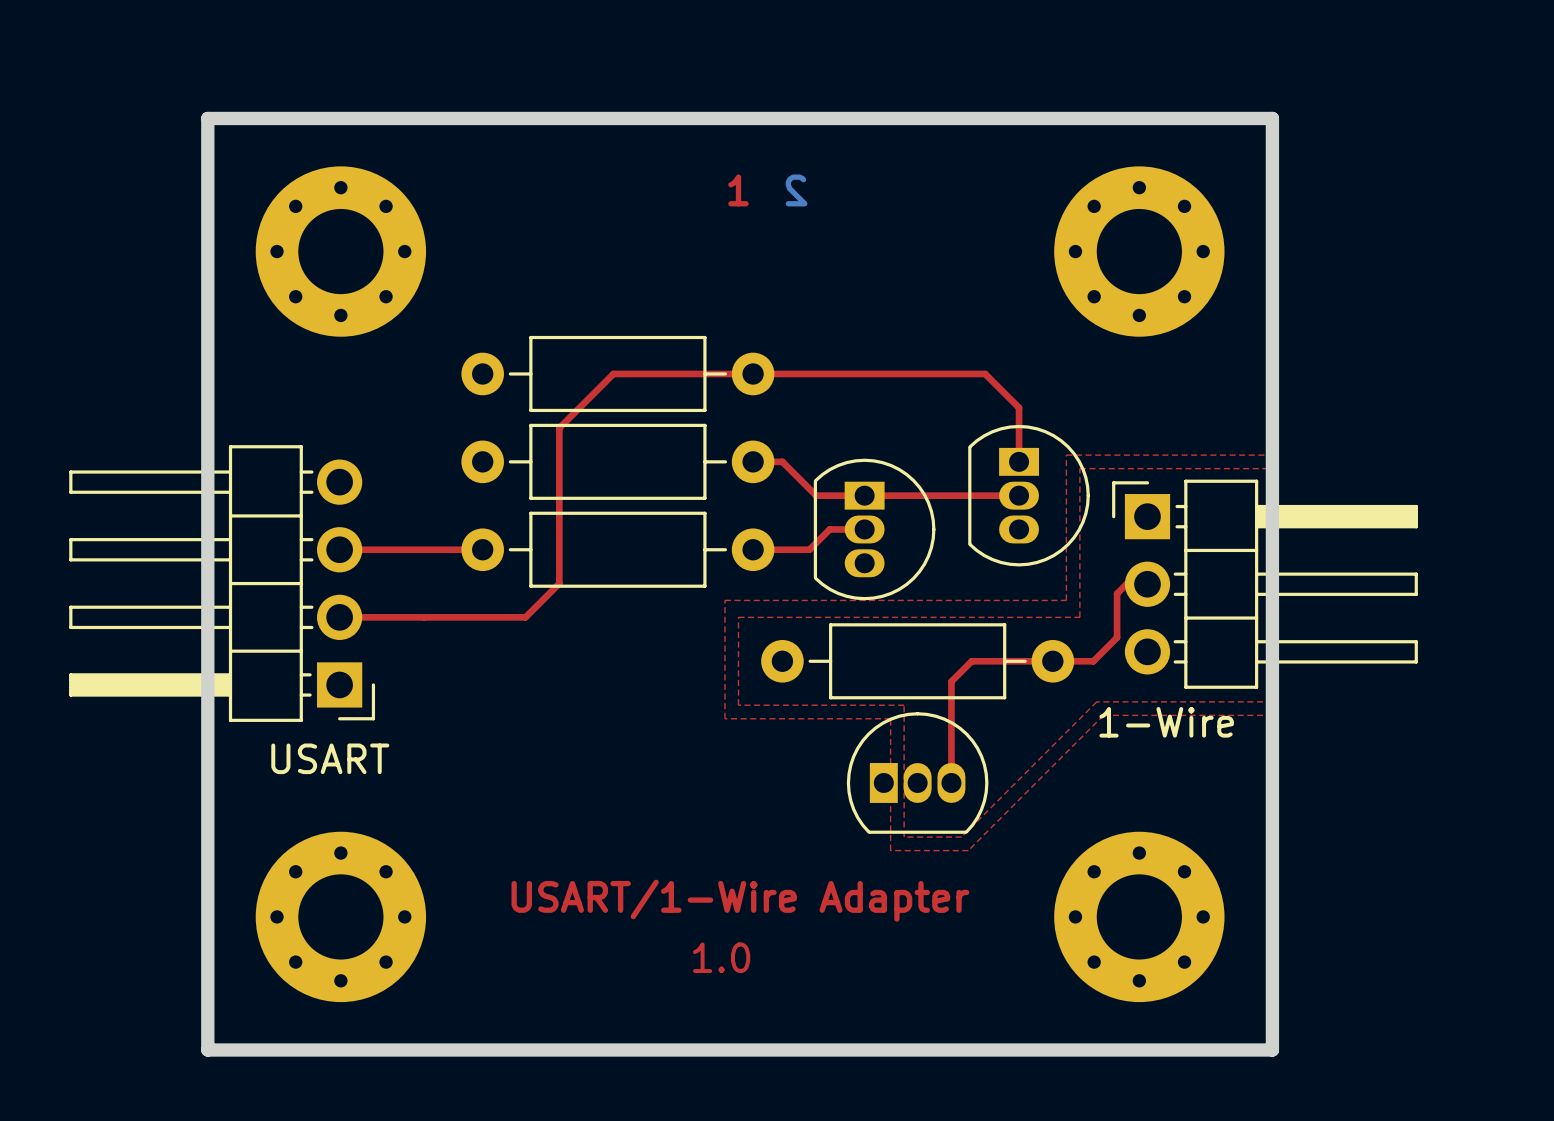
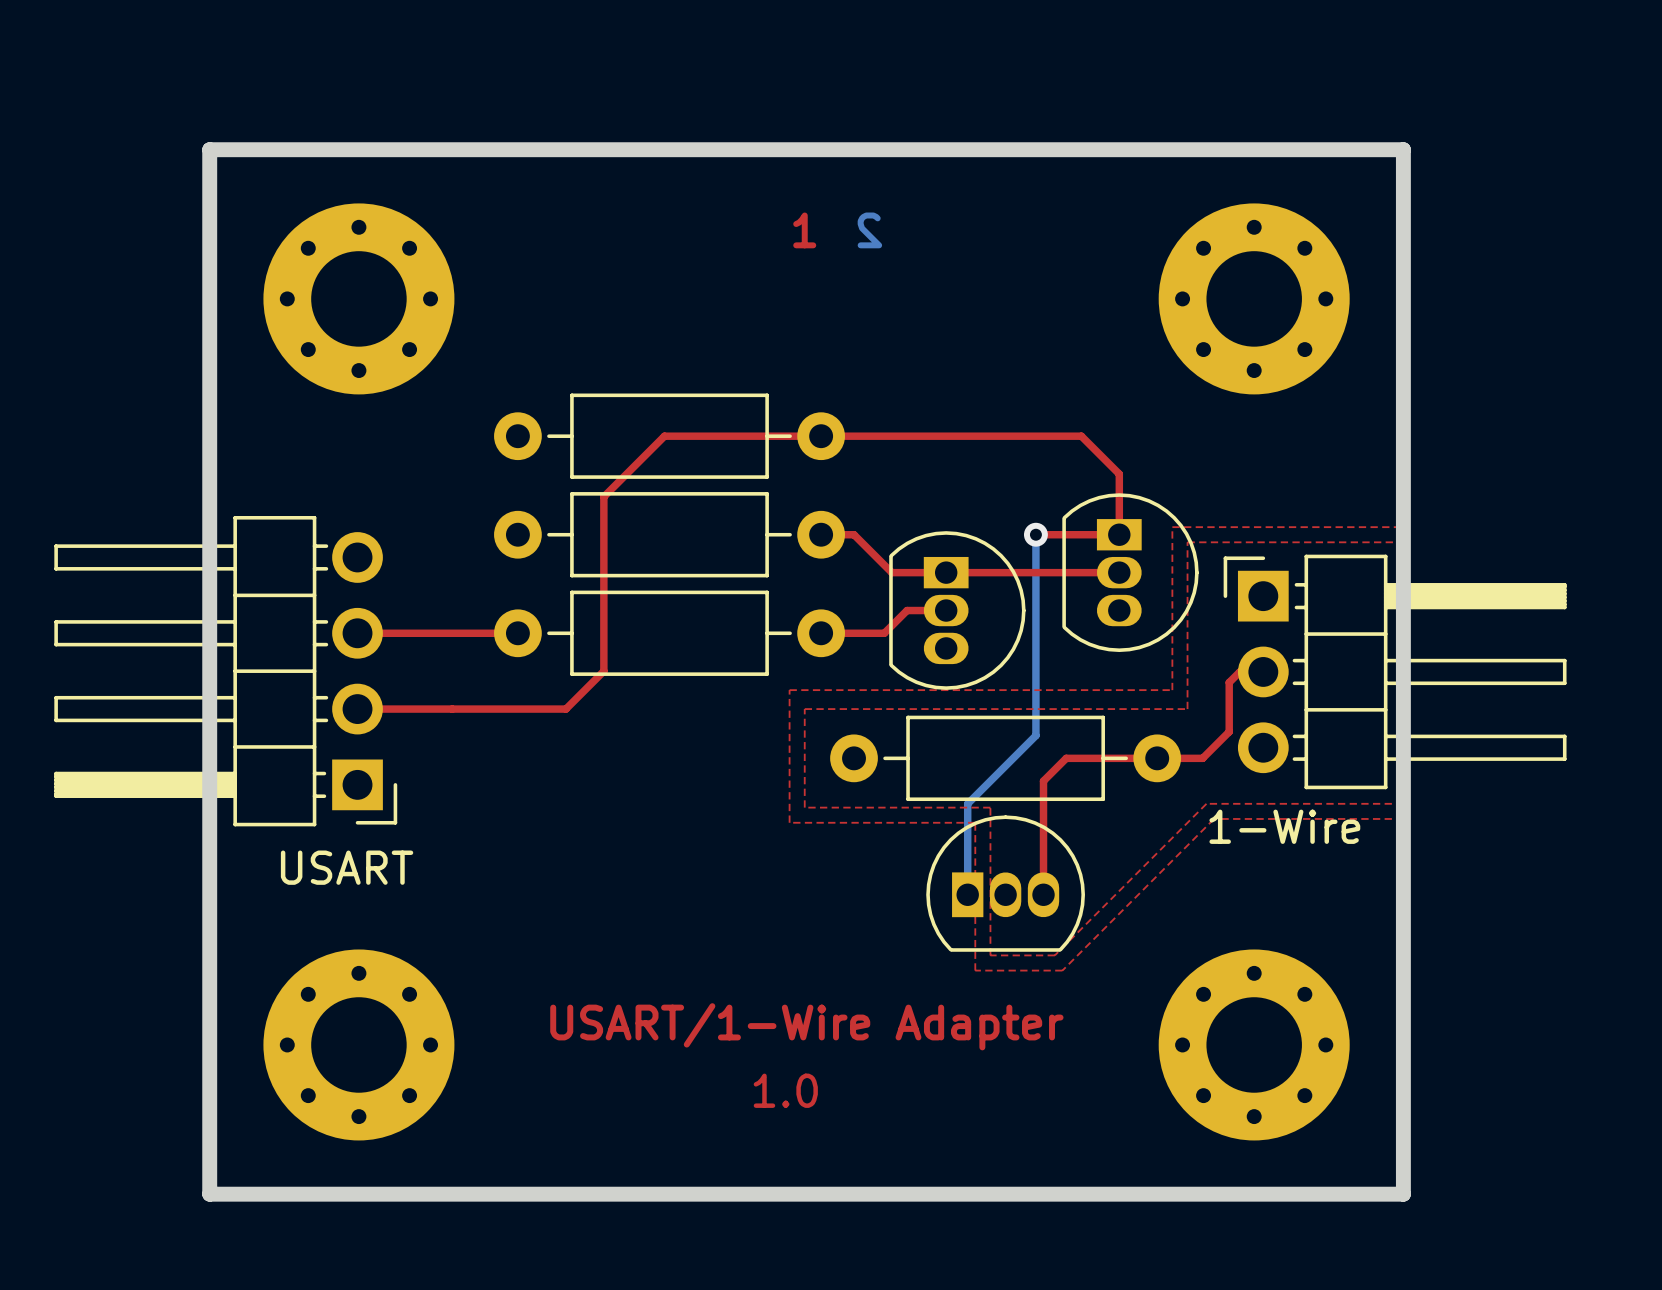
top track: none -> (1035, 534) (1119, 534)
bottom track: none -> (1035, 534) (1035, 735) (967, 803) (967, 894)
via: none -> (1035, 534)

